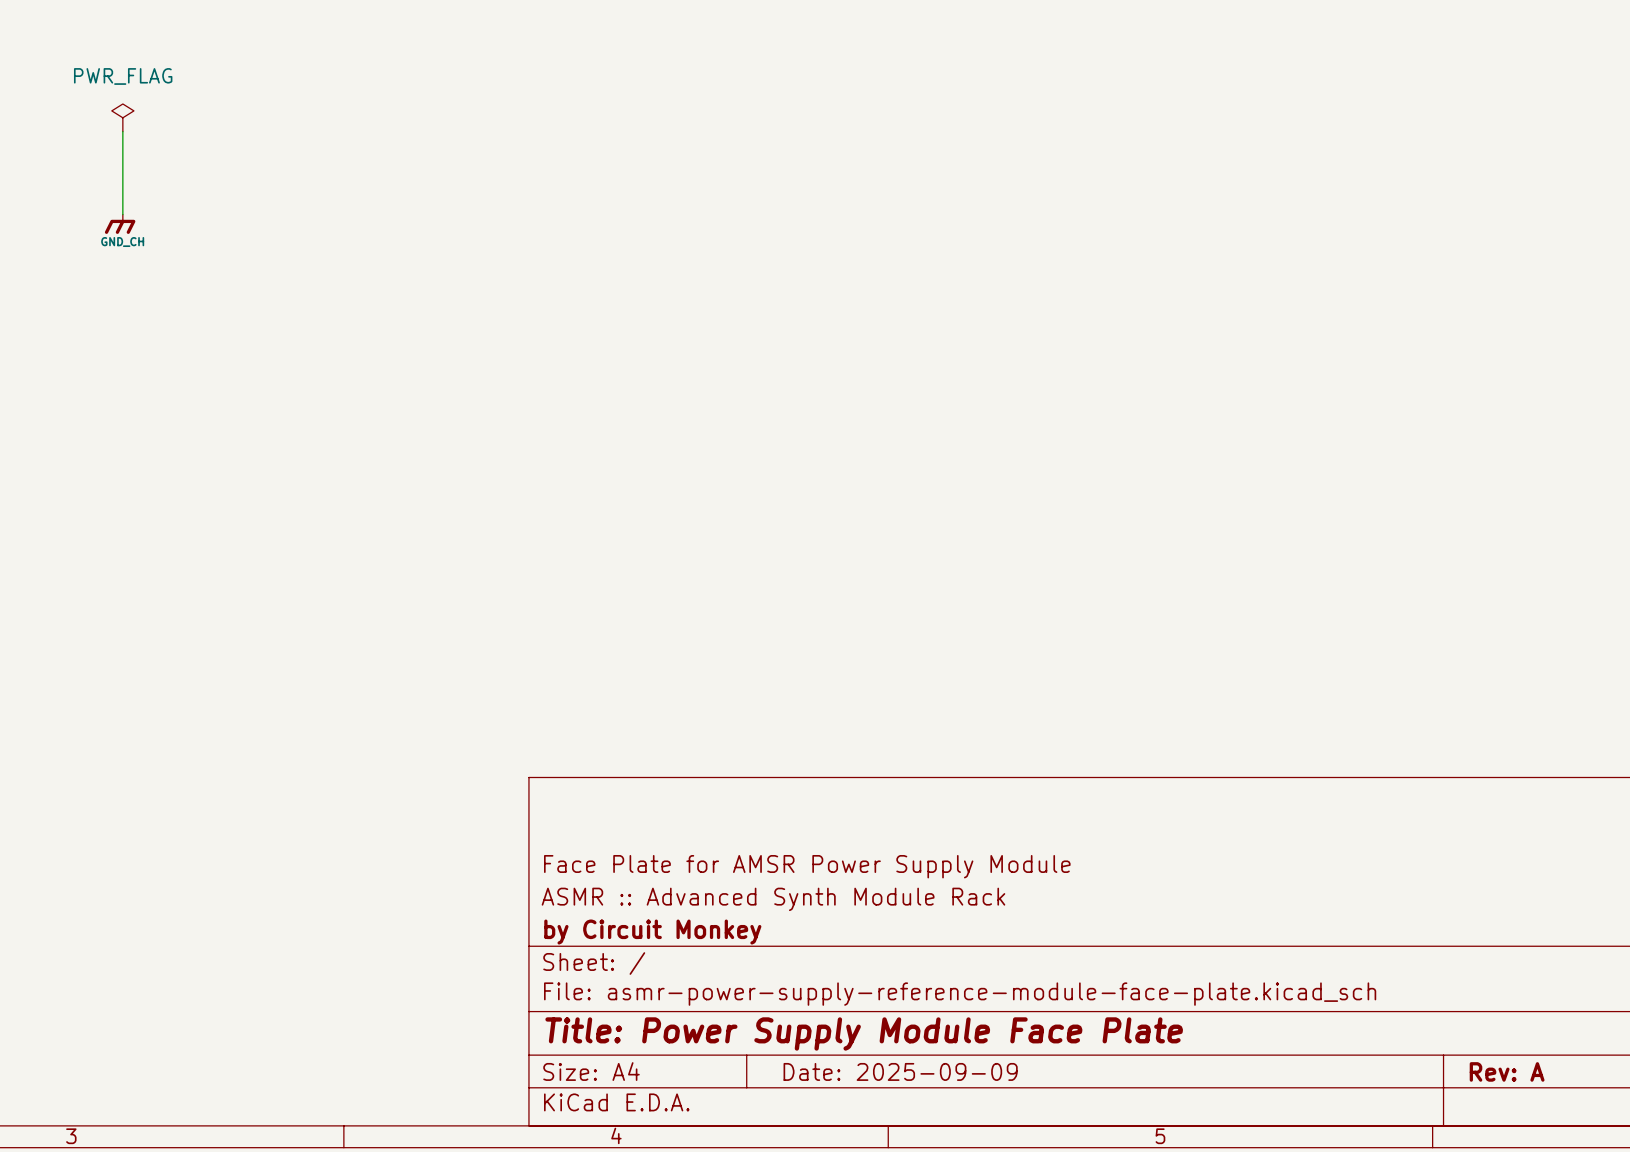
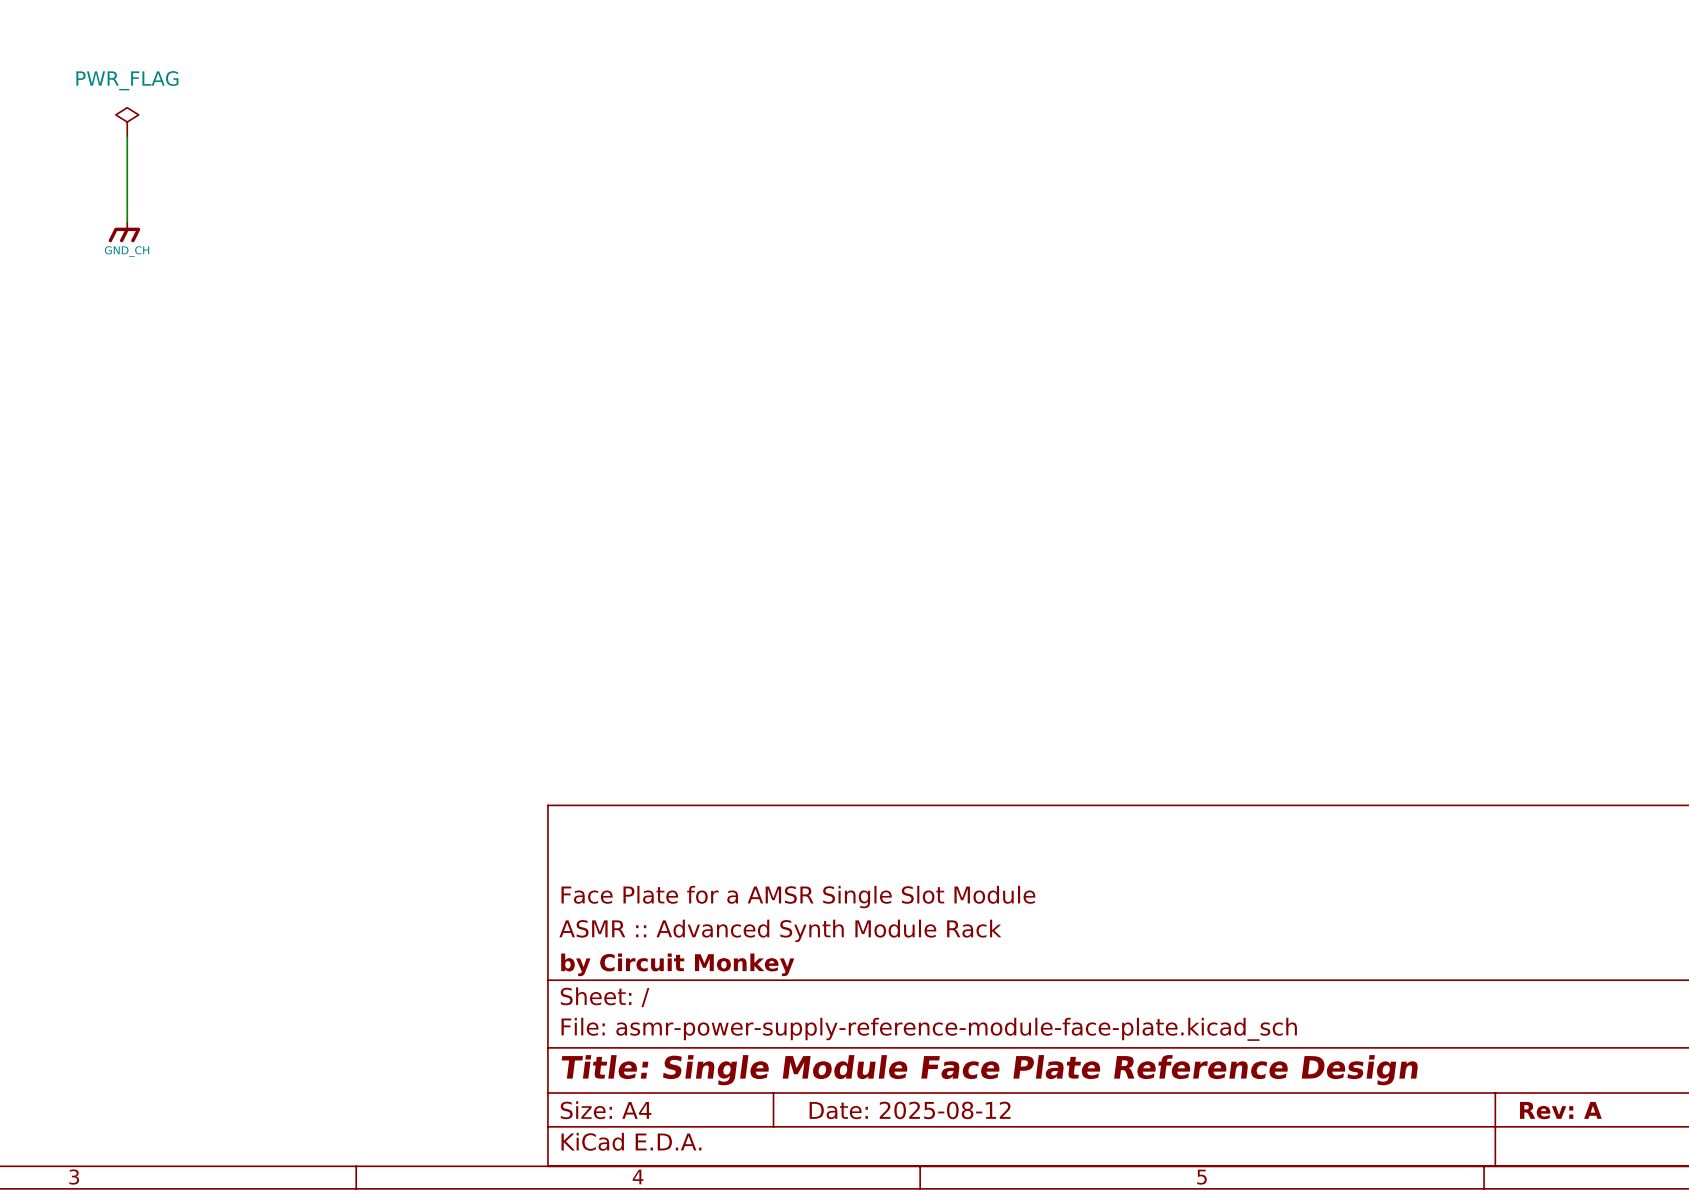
title block: Face Plate for AMSR Power Supply Module (807, 866) -> Face Plate for a AMSR Single Slot Module (798, 897)
title block: Title: Power Supply Module Face Plate (864, 1033) -> Title: Single Module Face Plate Reference Design (989, 1070)
title block: Date: 2025-09-09 (900, 1071) -> Date: 2025-08-12 (910, 1110)

